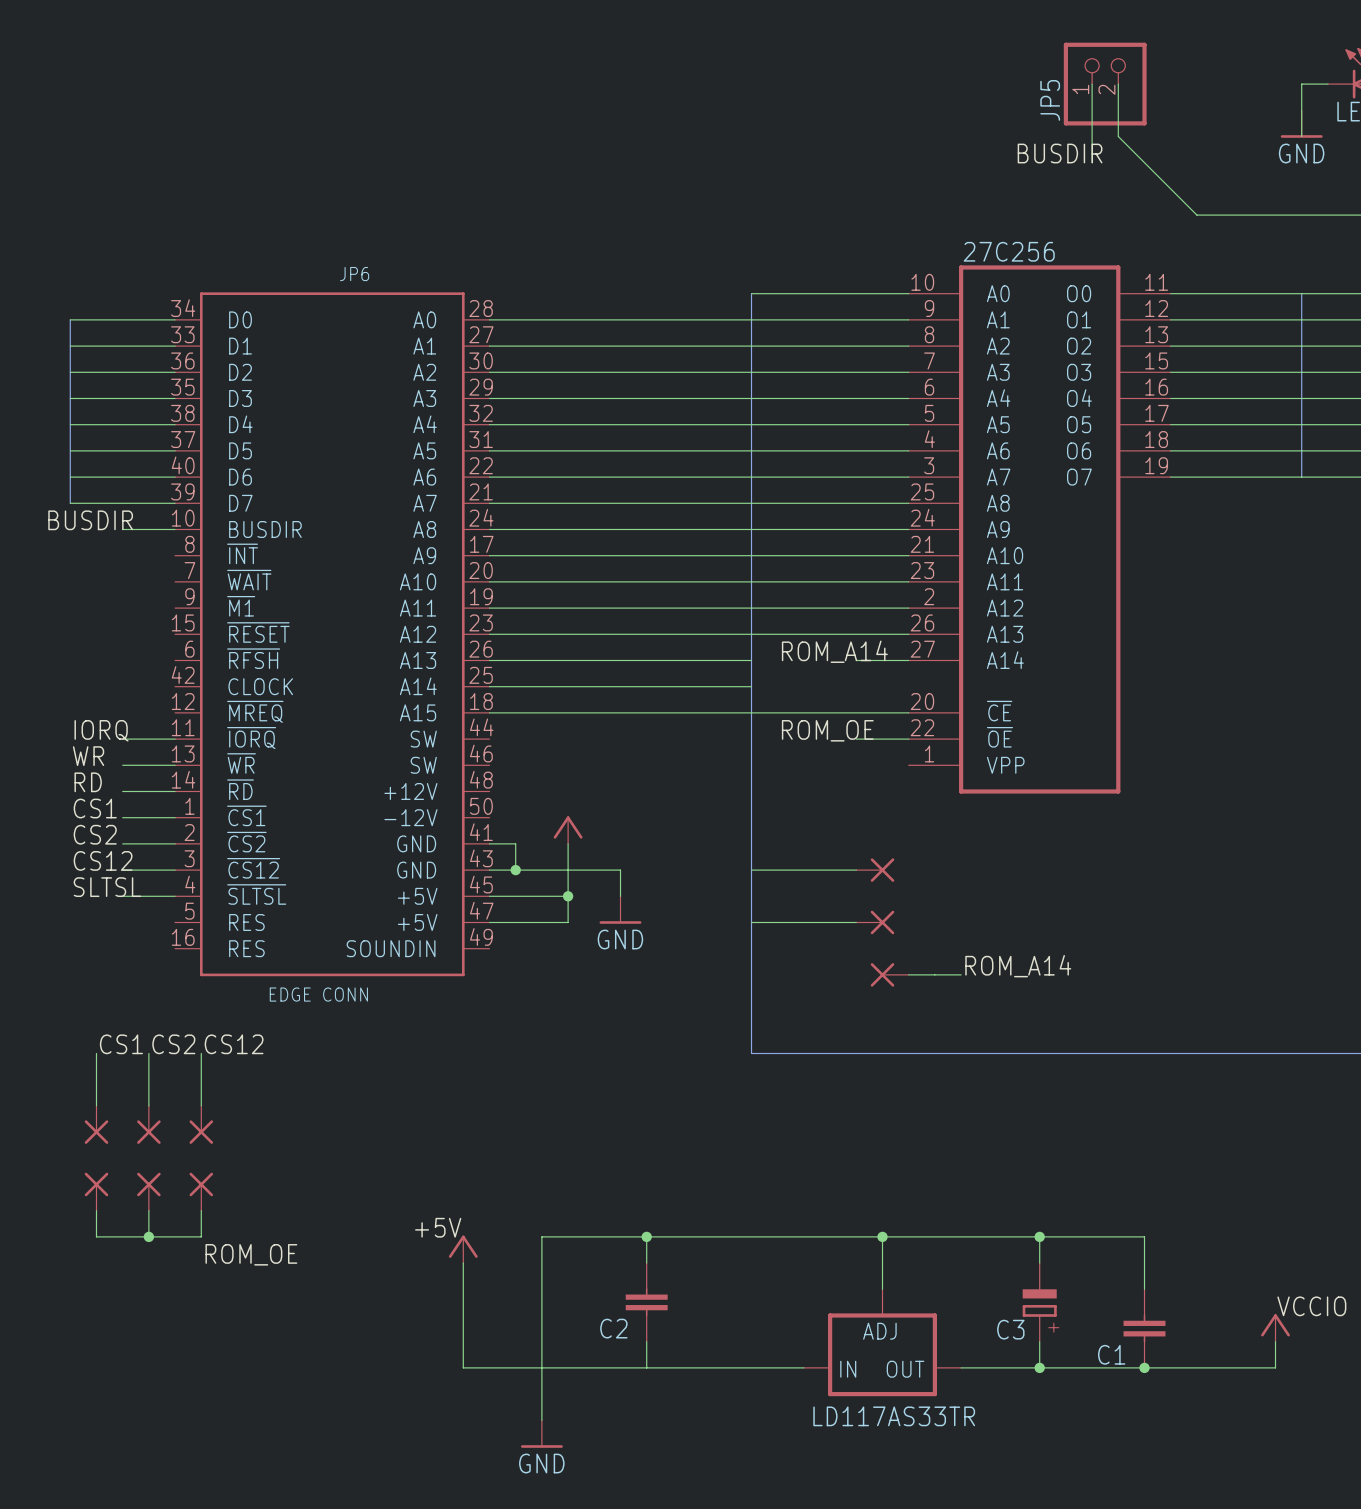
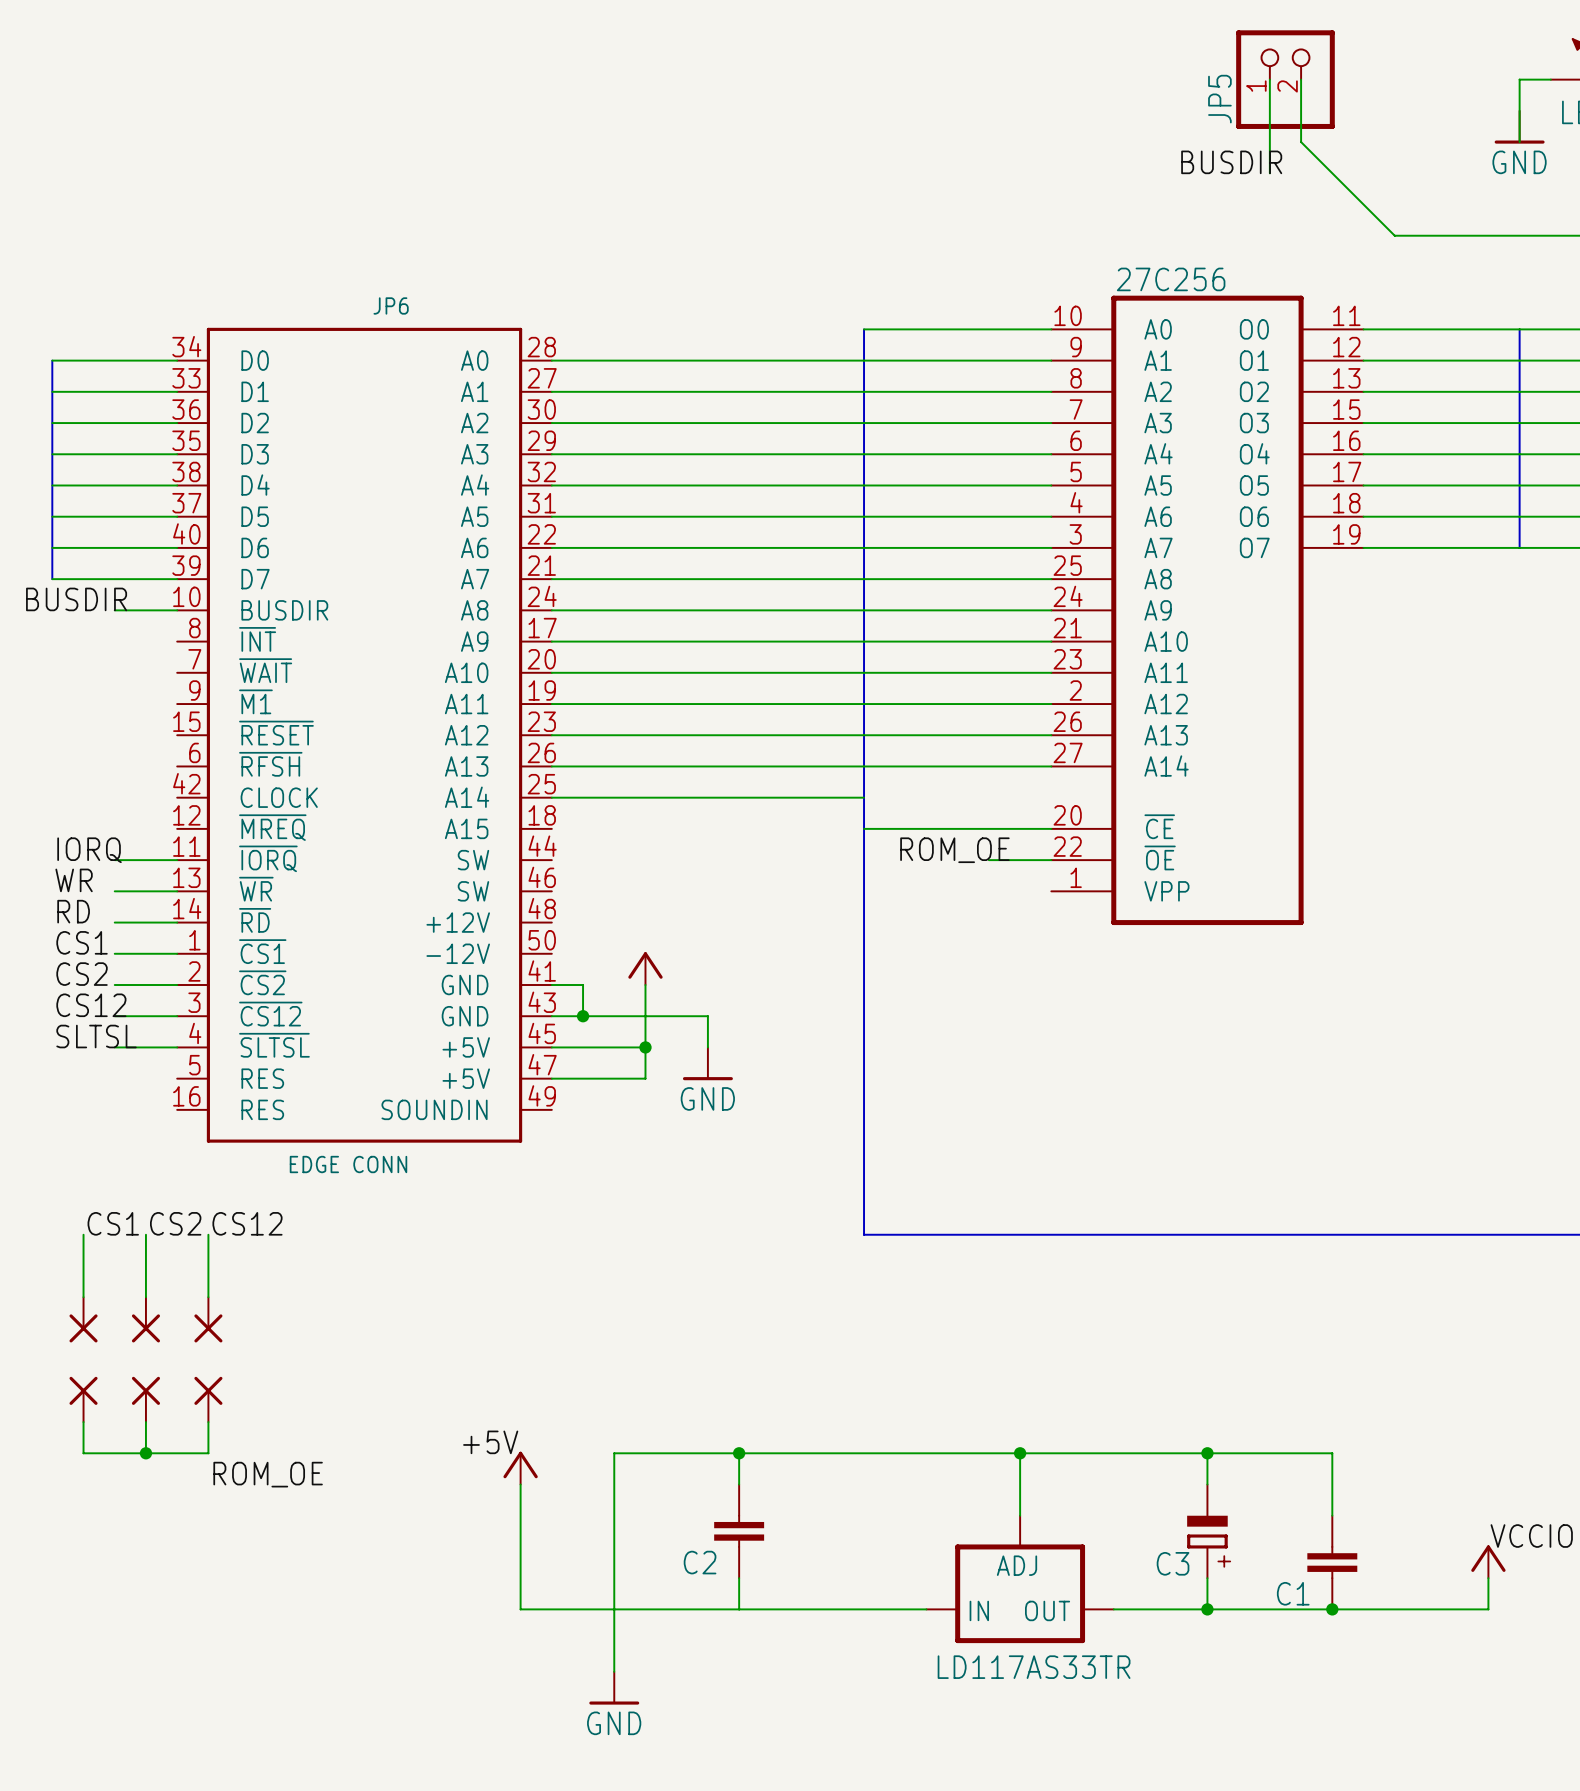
label: ROM_A14 (834, 651) -> none
wire: (489, 712) (751, 712) -> none
wire: (751, 870) (856, 870) -> (864, 766) (988, 766)
part: (875, 870) -> none
wire: (751, 922) (856, 922) -> none
part: (875, 922) -> none
label: ROM_A14 (1018, 966) -> none
part: (889, 974) -> none
wire: (908, 974) (961, 974) -> none

